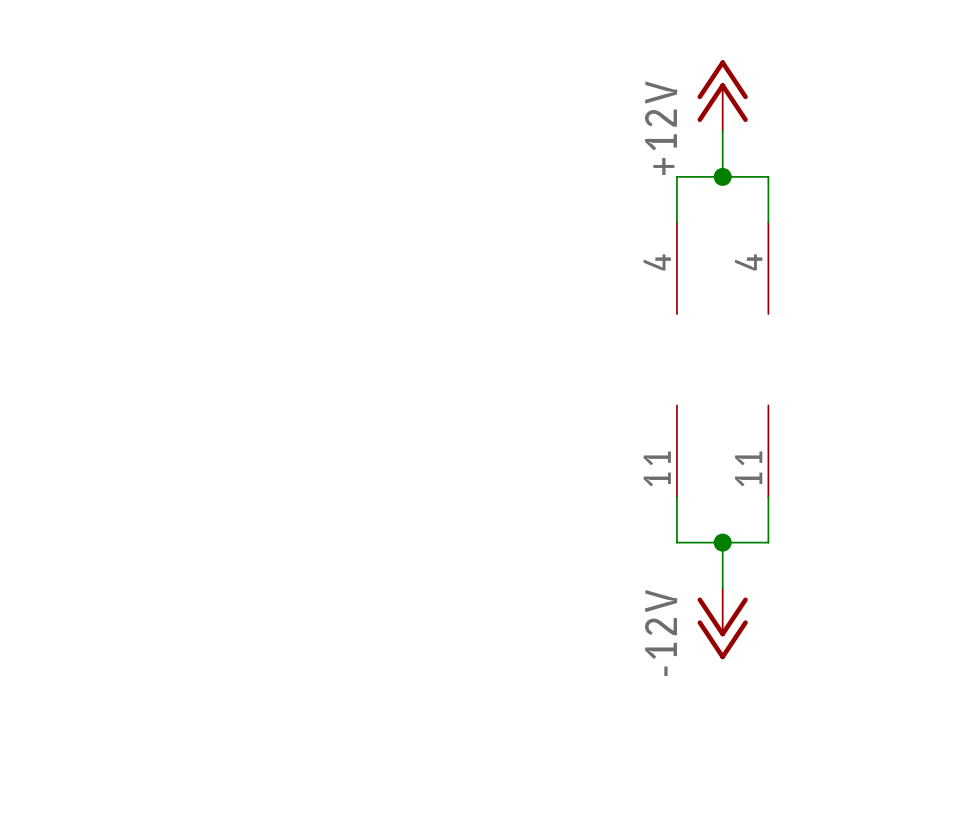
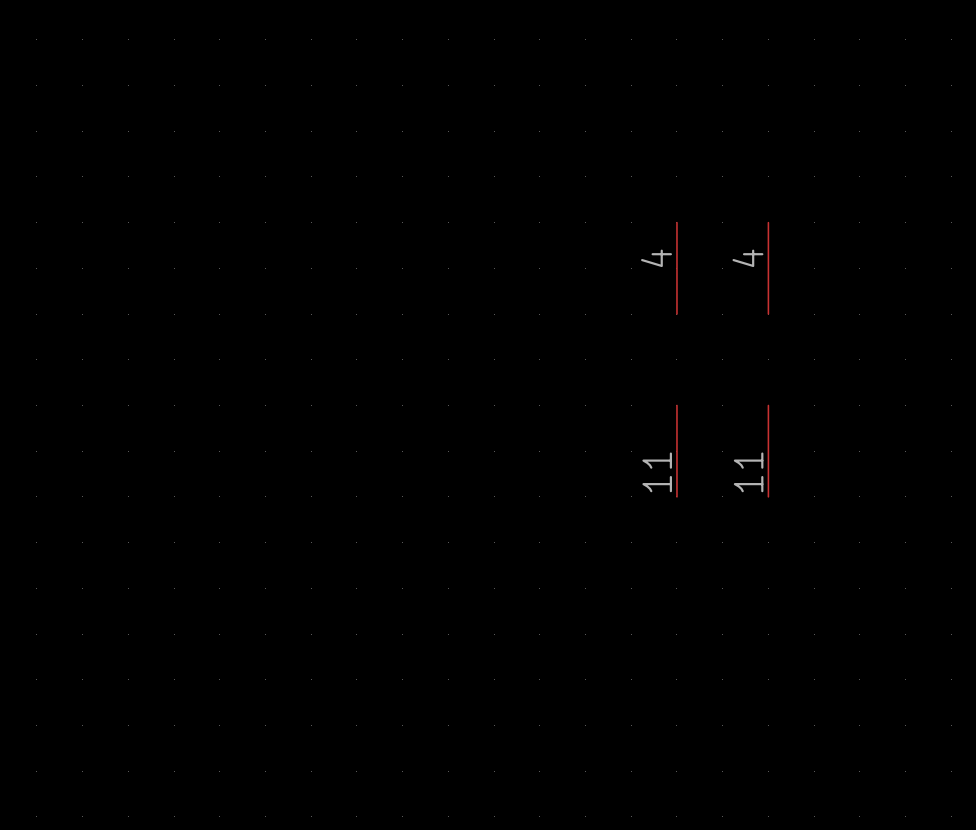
power symbol: +12V (722, 95) -> none
wire: (722, 131) (722, 176) -> none
junction: (722, 176) -> none
wire: (676, 222) (676, 176) (768, 176) (768, 222) -> none
wire: (676, 496) (676, 542) (768, 542) (768, 496) -> none
wire: (722, 542) (722, 588) -> none
junction: (722, 542) -> none
power symbol: -12V (722, 623) -> none

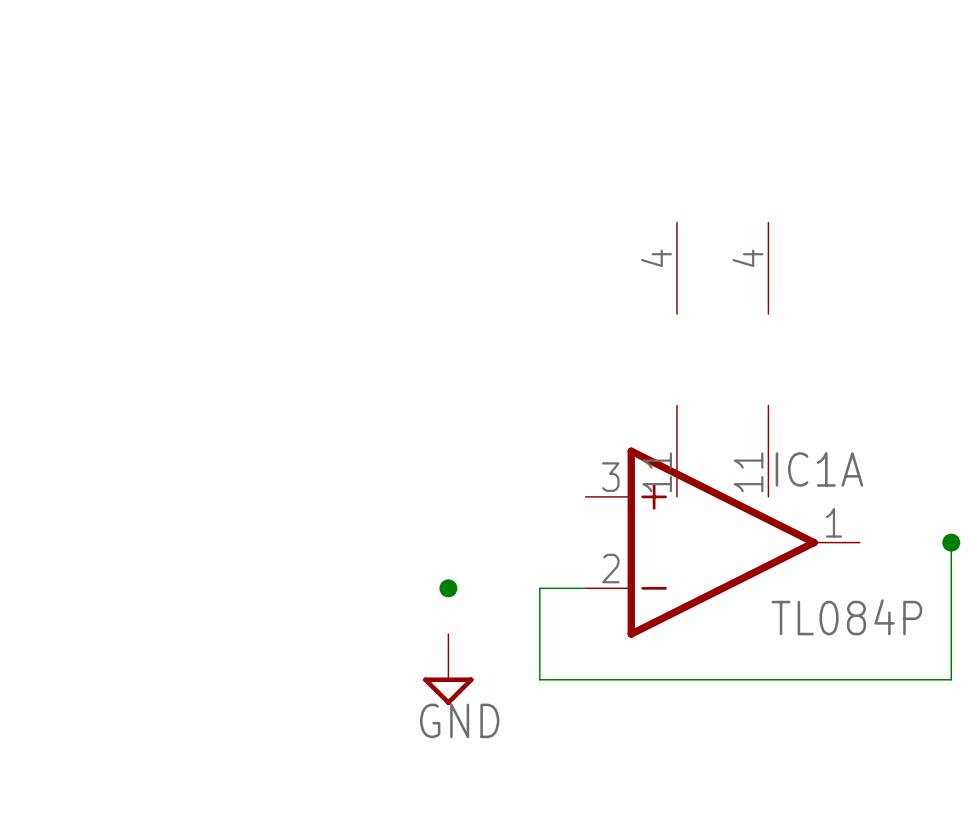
IC1A: none -> TL084P (722, 542)
wire: none -> (951, 542) (951, 679) (539, 679) (539, 588) (585, 588)
junction: none -> (951, 542)
junction: none -> (448, 588)
power symbol: none -> GND (448, 669)

